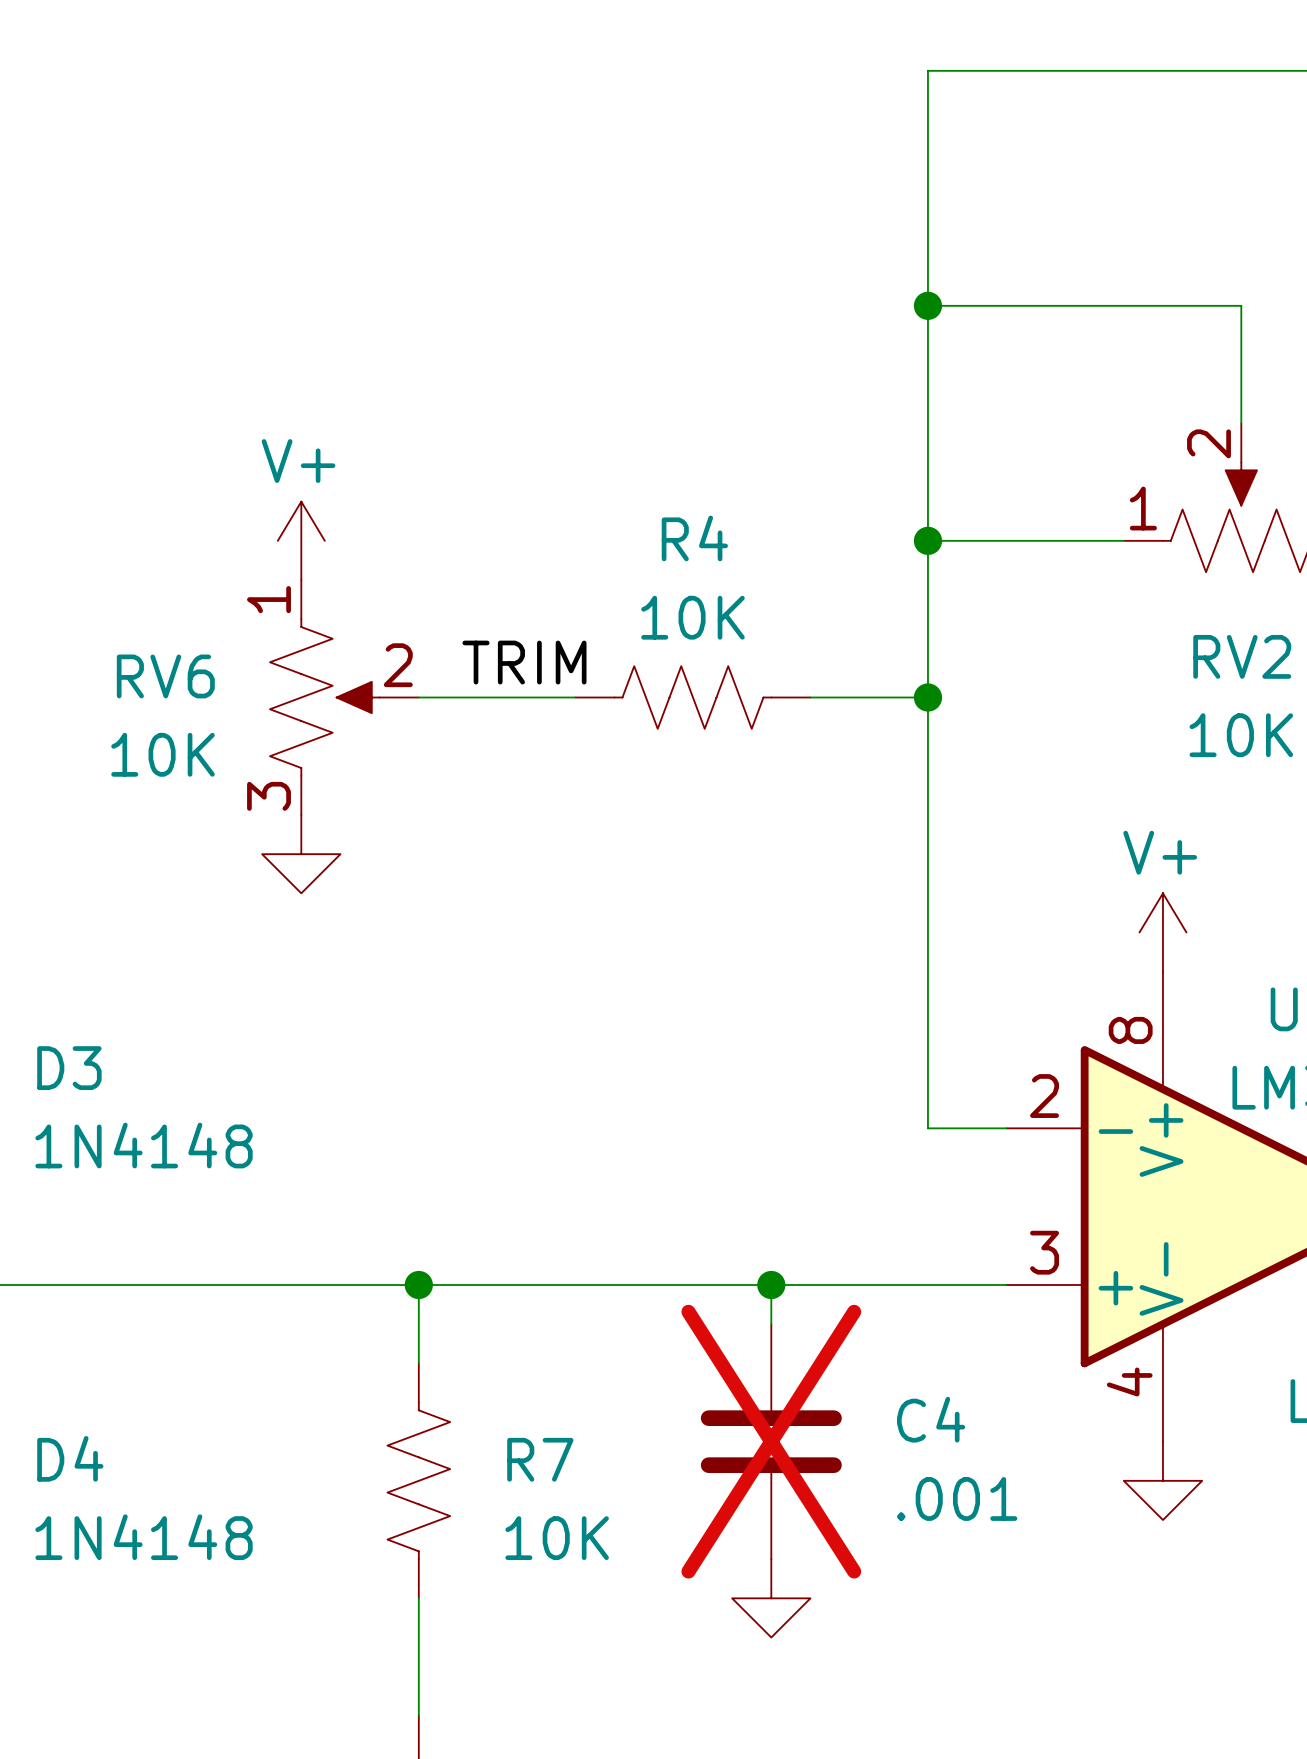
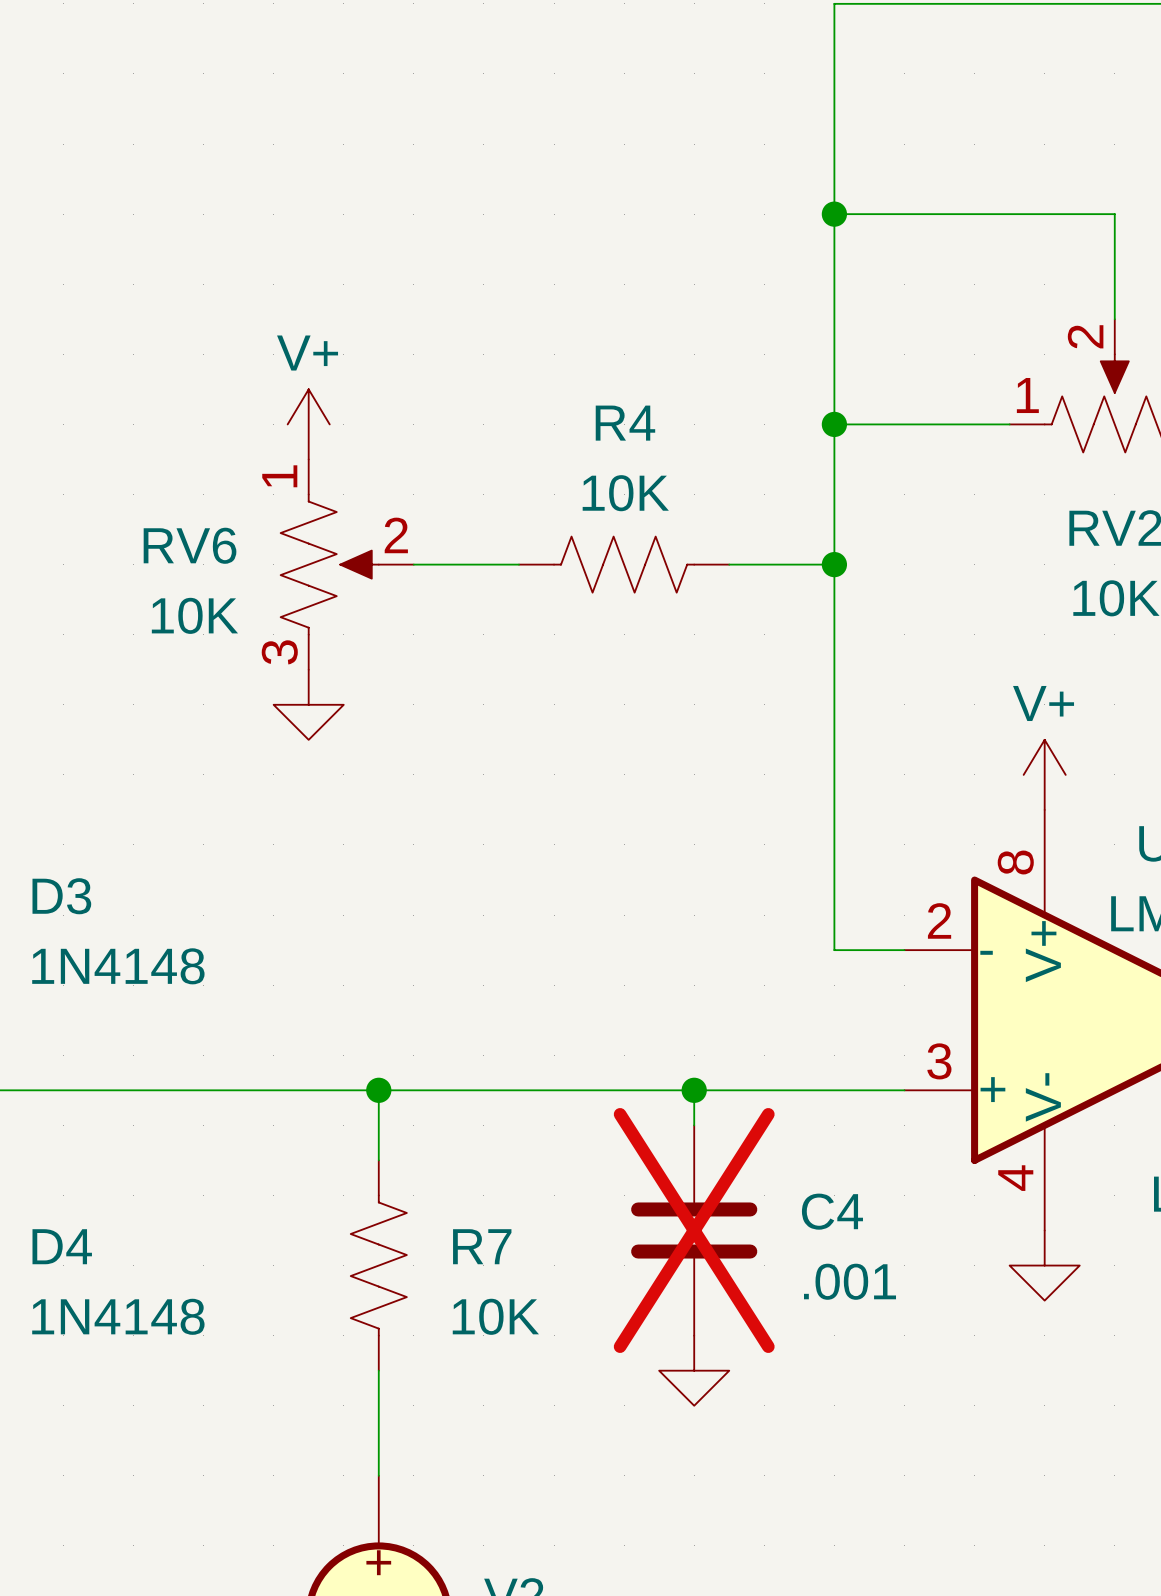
power symbol position: V+ (301, 540) -> V+ (308, 424)
label: TRIM (524, 662) -> none
RV6 position: (344, 697) -> (347, 564)
power symbol position: (301, 854) -> (308, 704)

